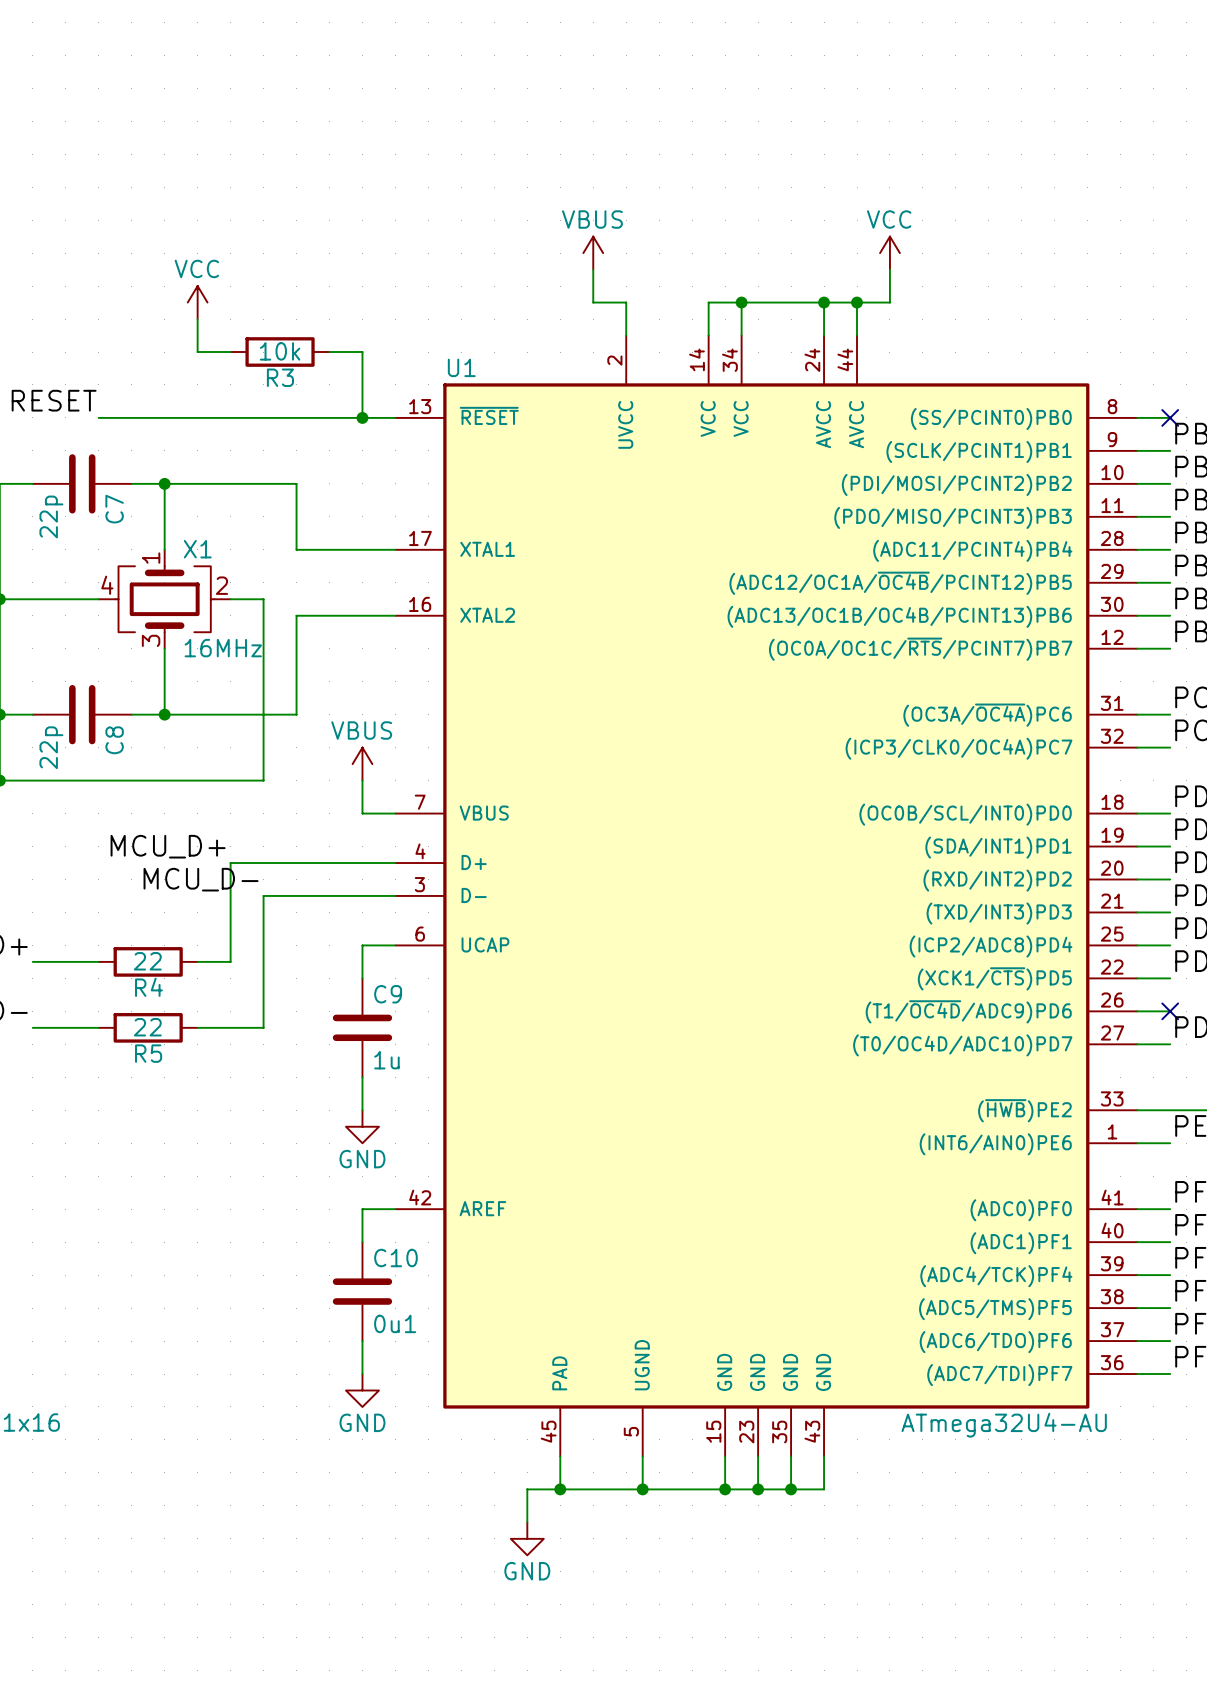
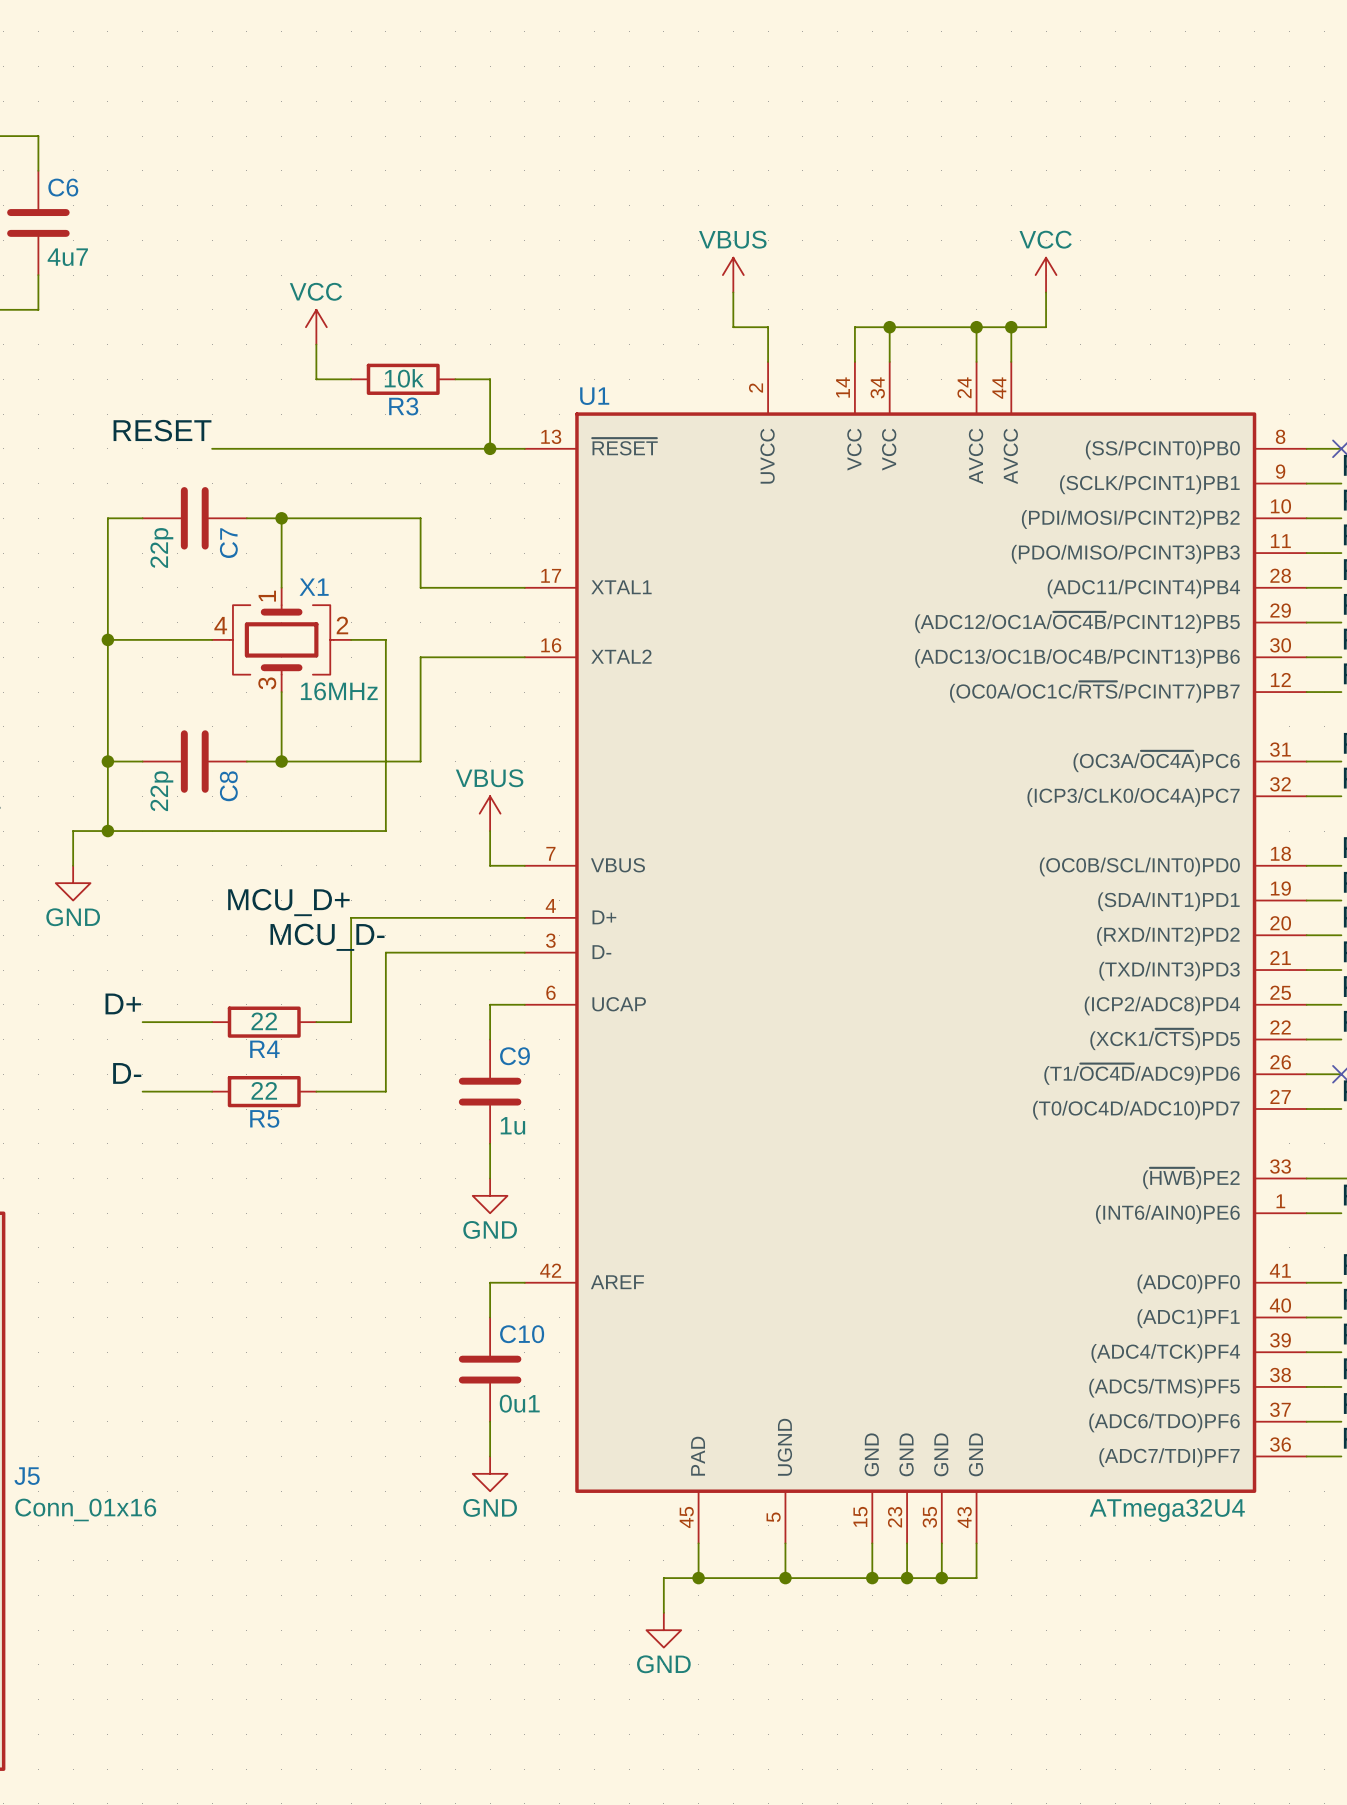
U1 value: ATmega32U4-AU (1004, 1425) -> ATmega32U4 (1167, 1510)

